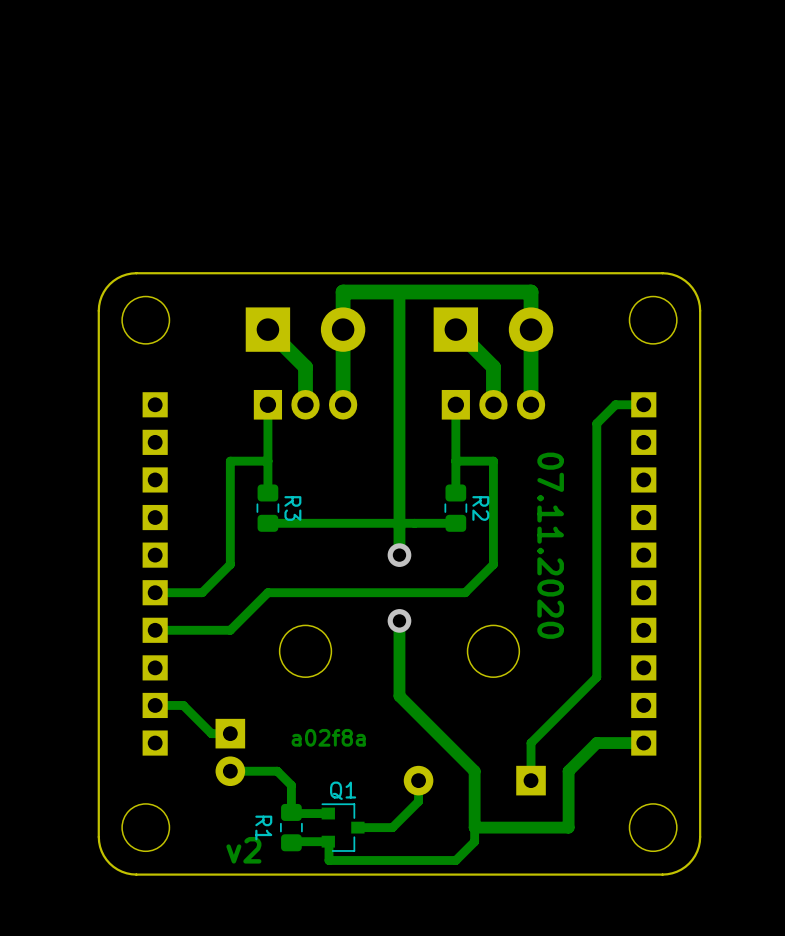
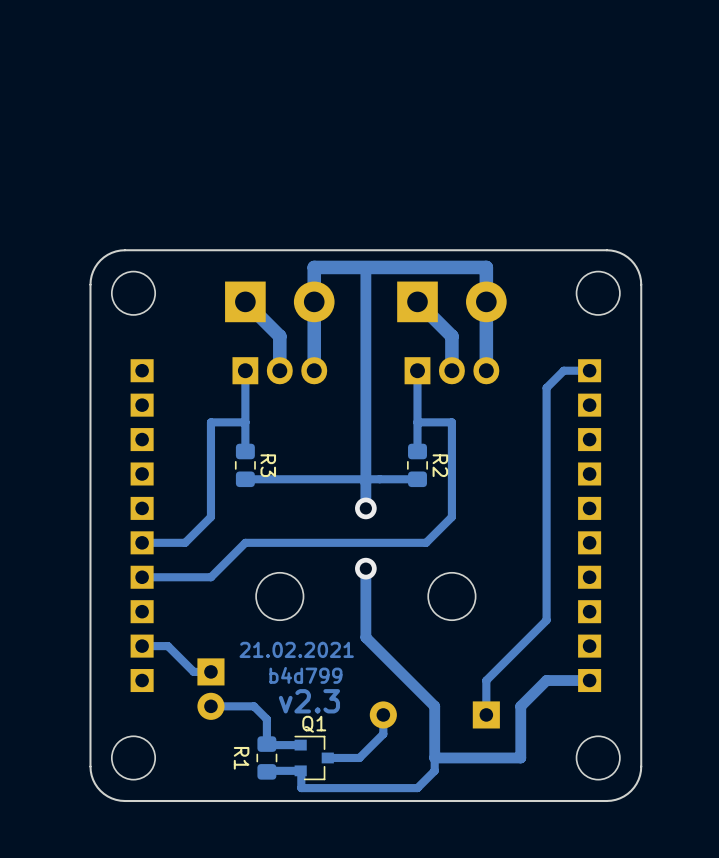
text: 07.11.2020 (550, 545) -> none
text: none -> 21.02.2021 (296, 649)
text: a02f8a (328, 737) -> b4d799 (305, 675)
text: none -> v2.3 (309, 701)
text: v2 (243, 850) -> none

